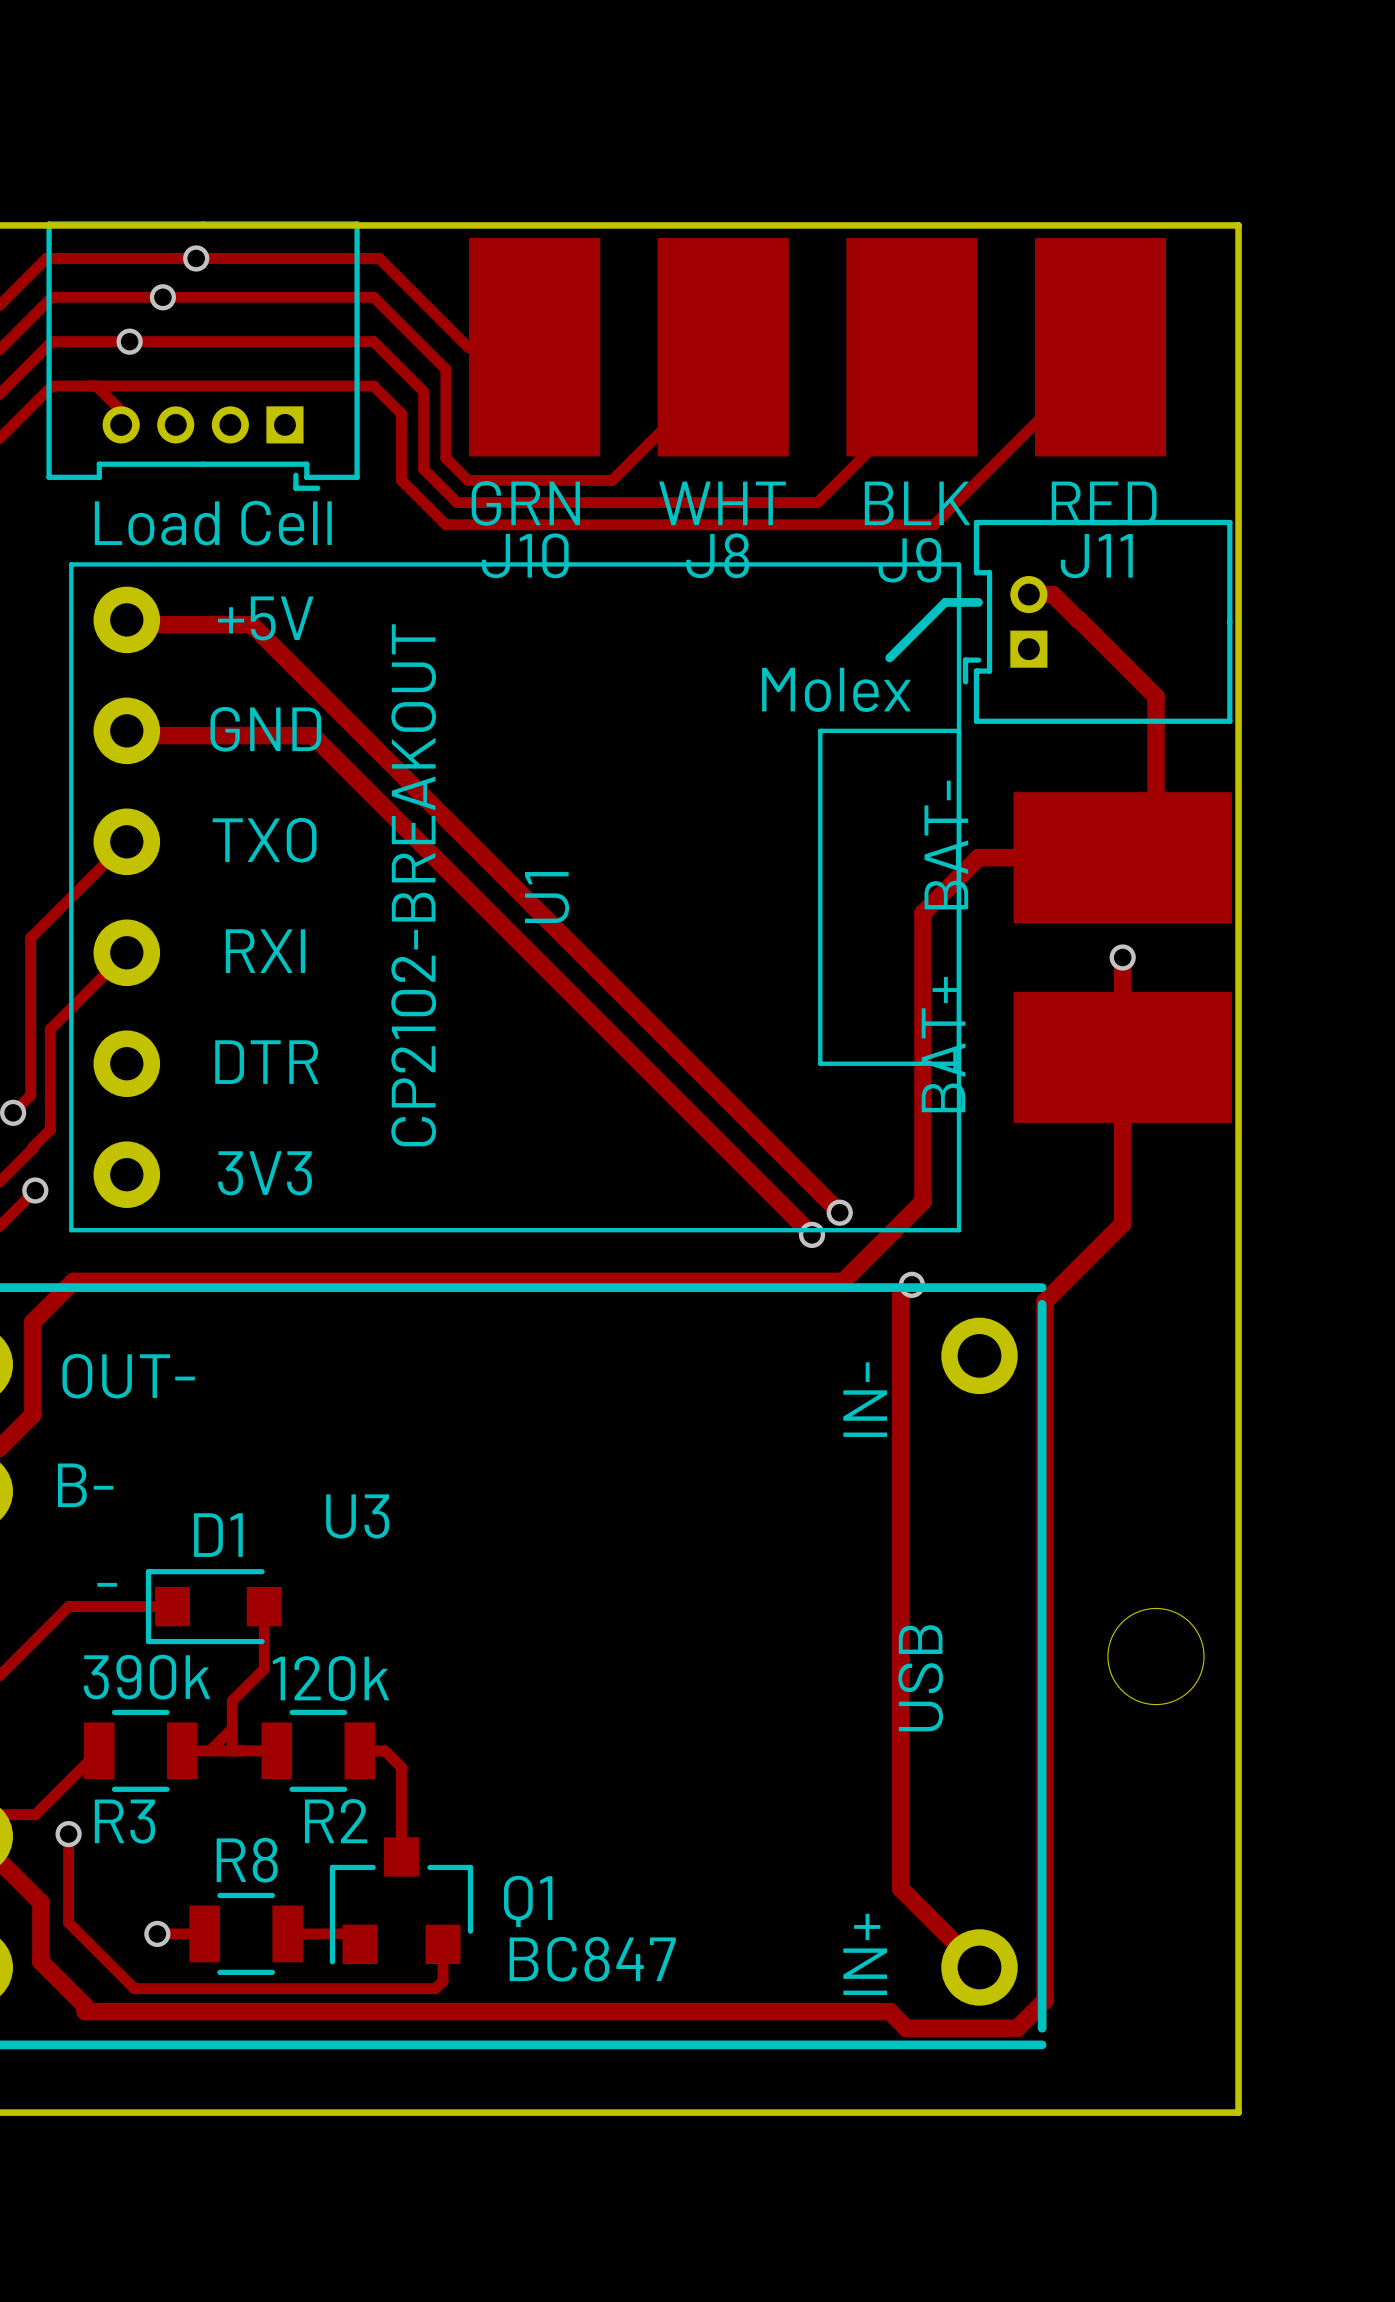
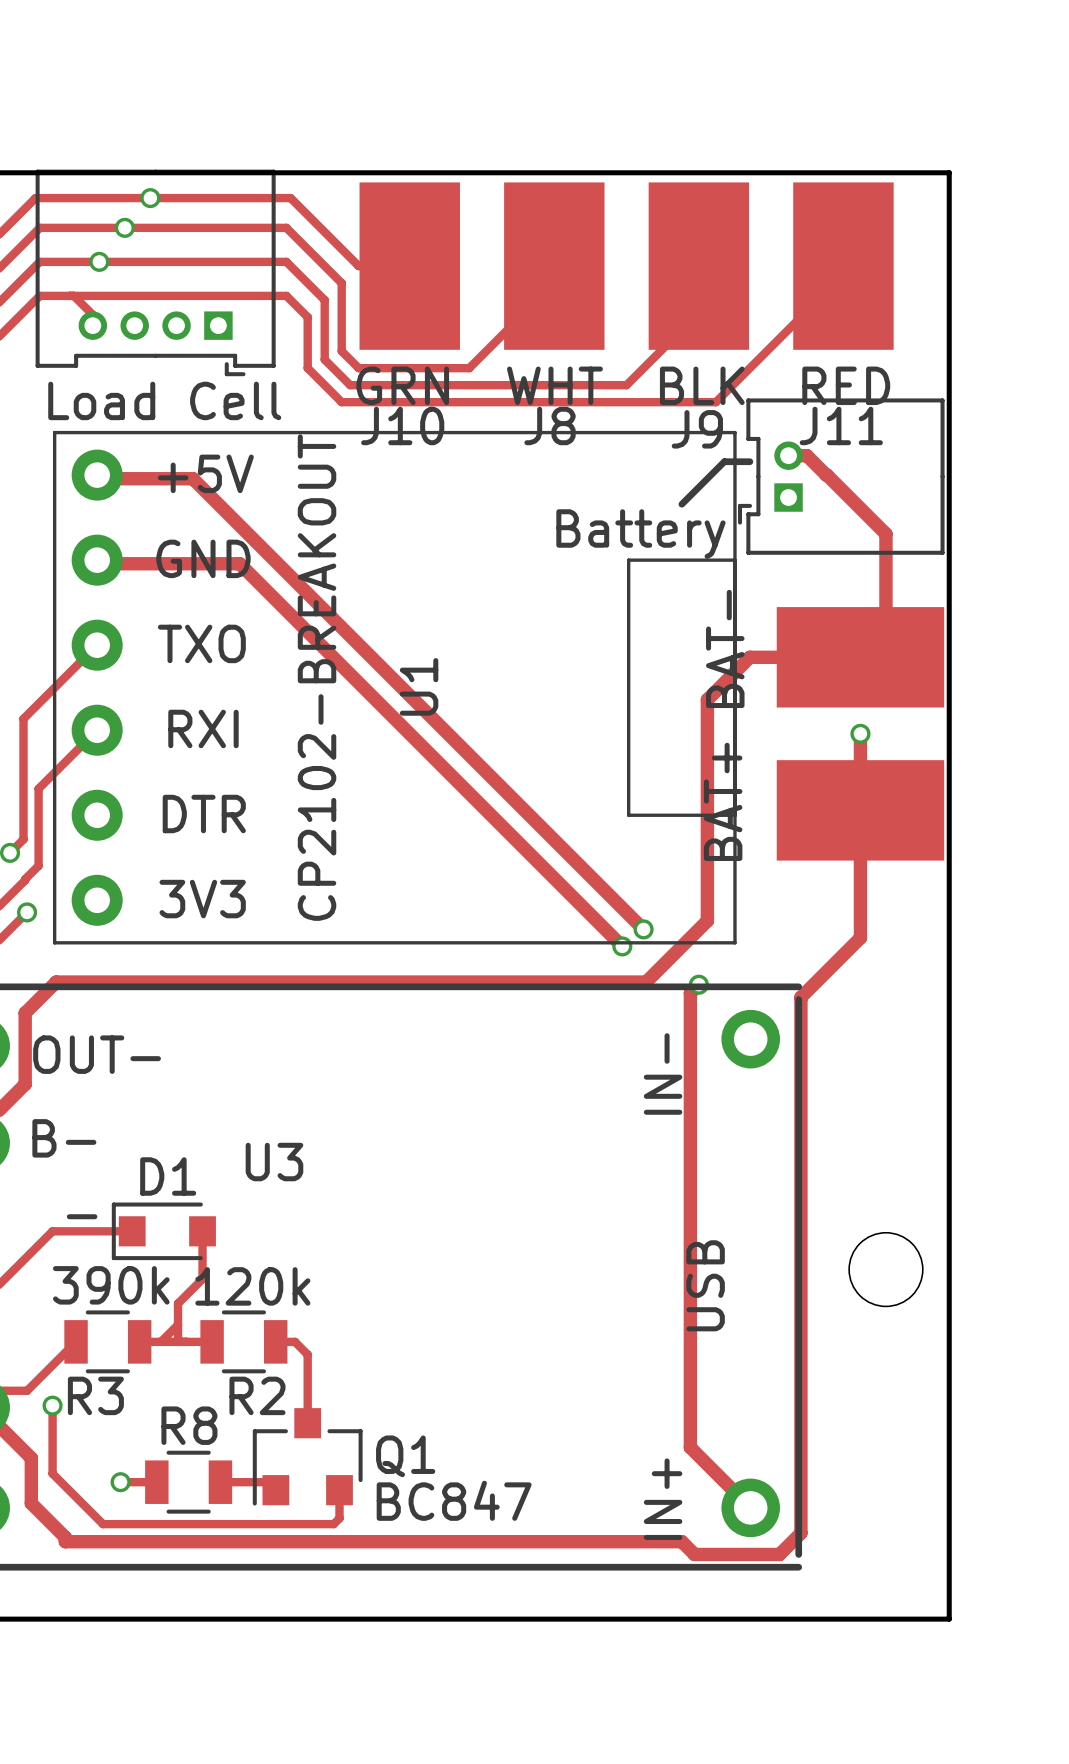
part value: Molex (836, 689) -> Battery (640, 534)

